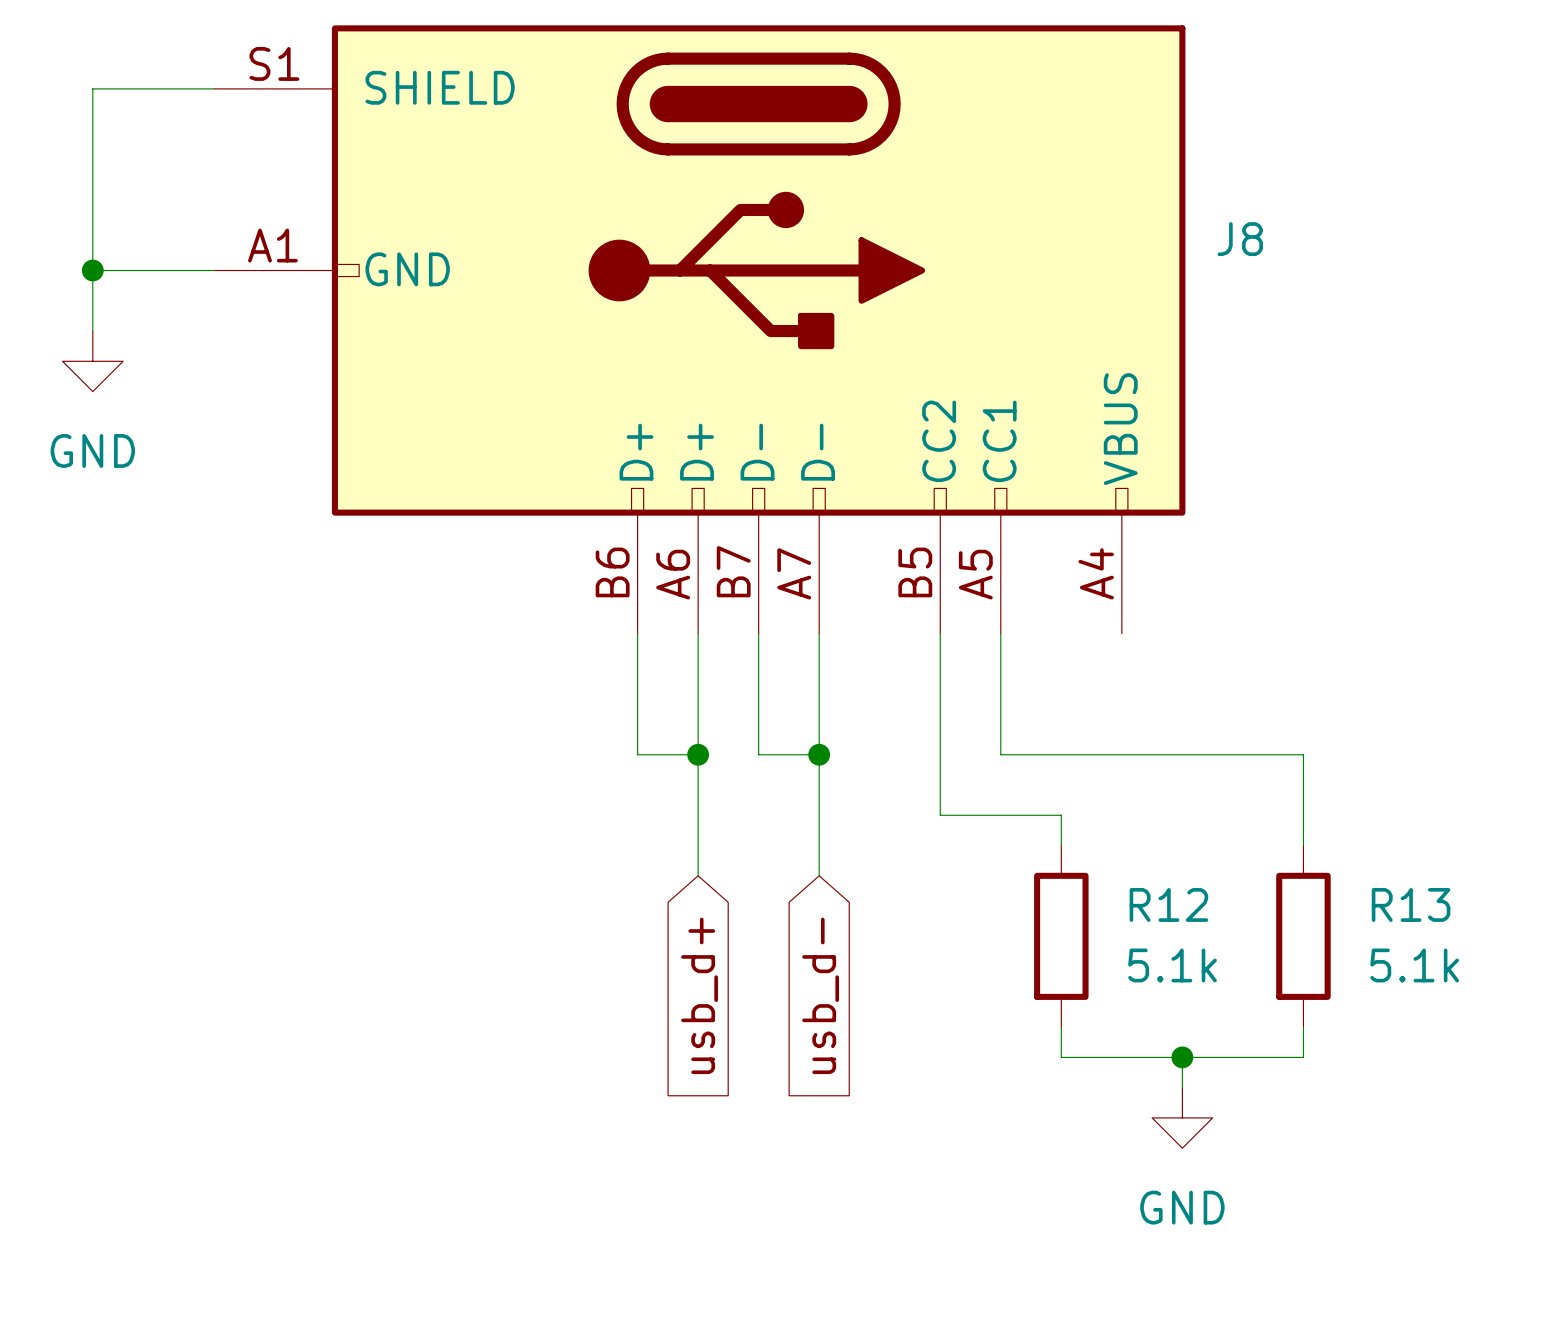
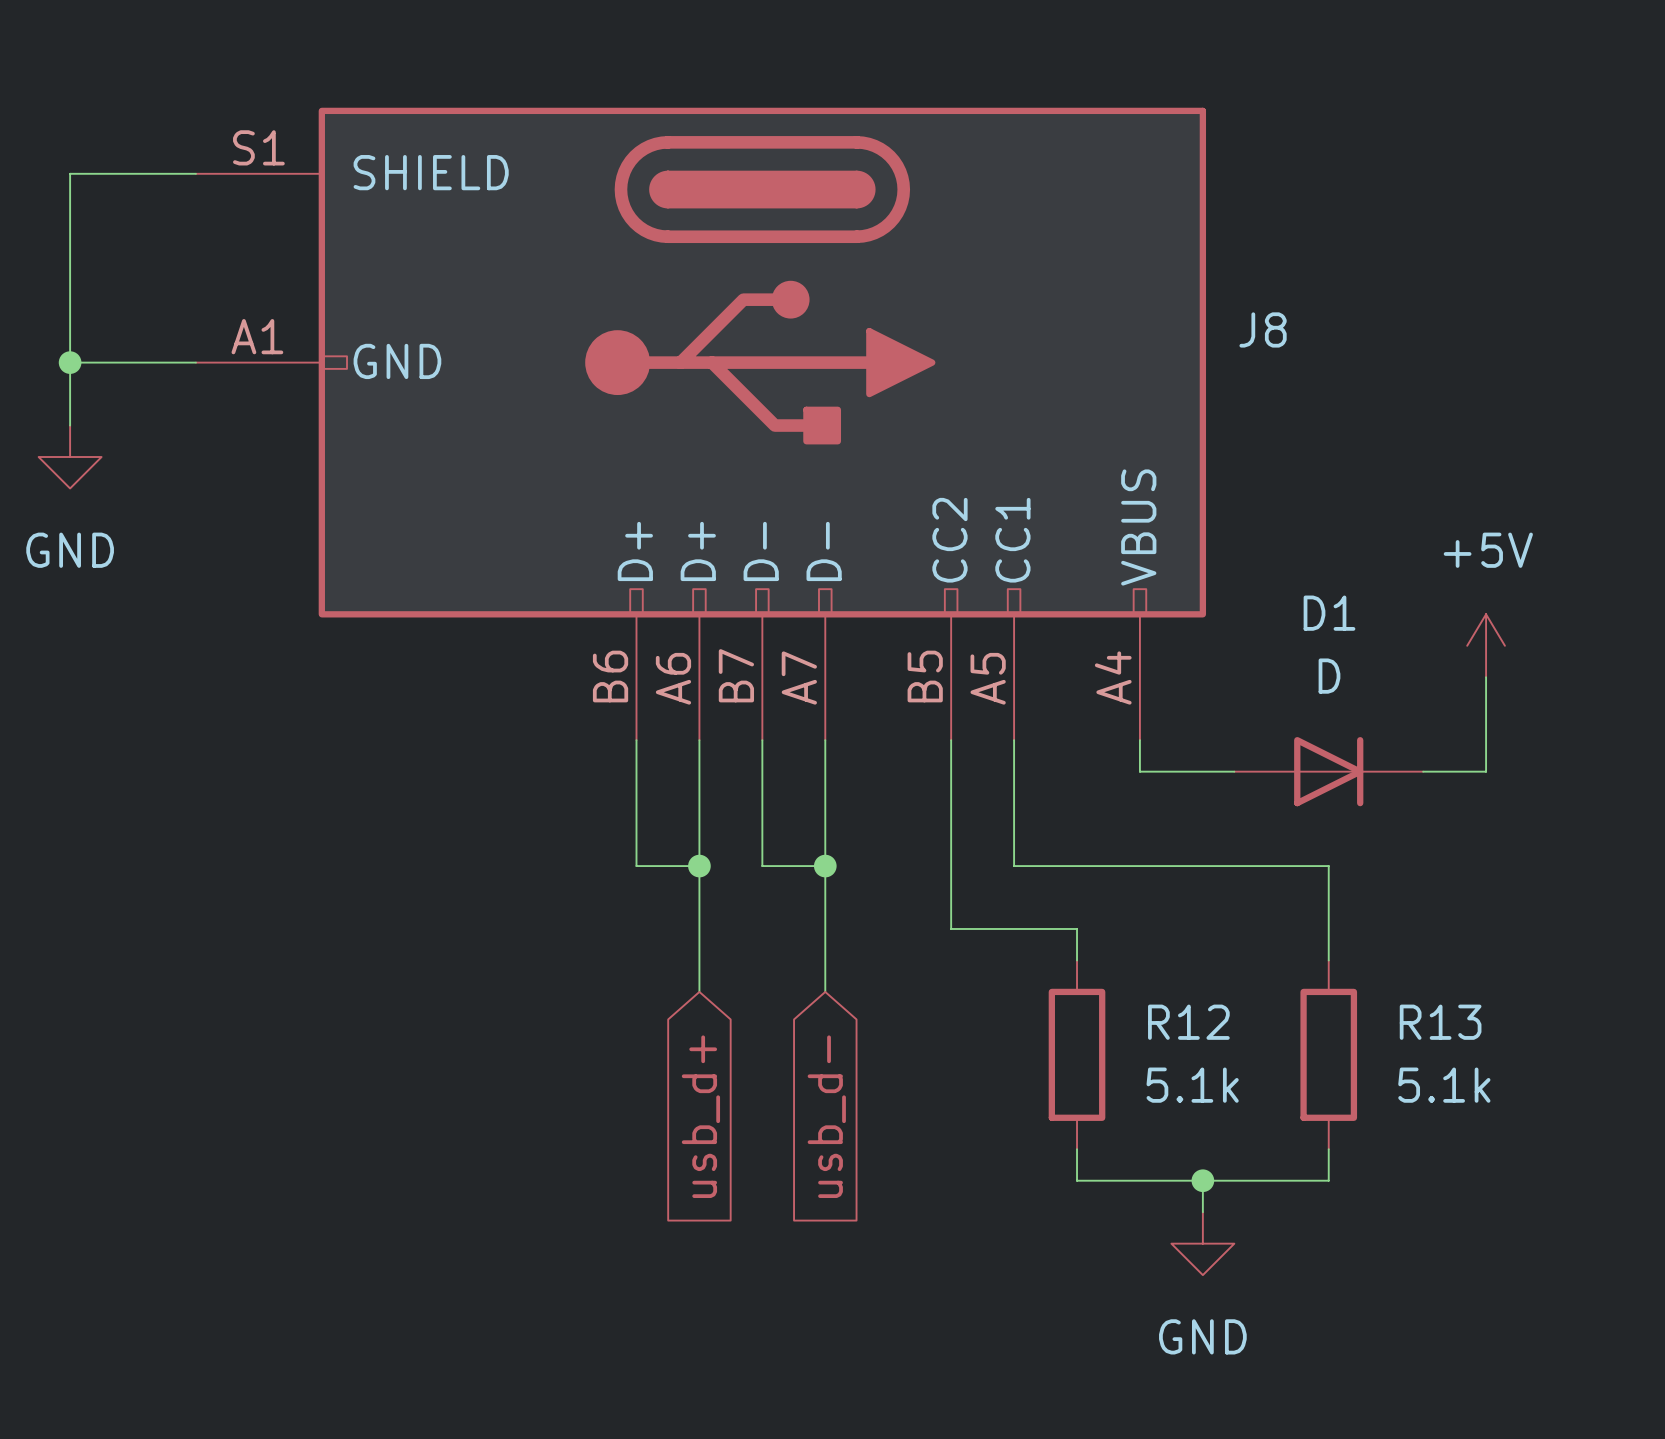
power symbol: none -> +5V (1486, 645)
wire: none -> (1486, 677) (1486, 771) (1423, 771)
wire: none -> (1139, 740) (1139, 771) (1234, 771)
D1: none -> D (1328, 771)

